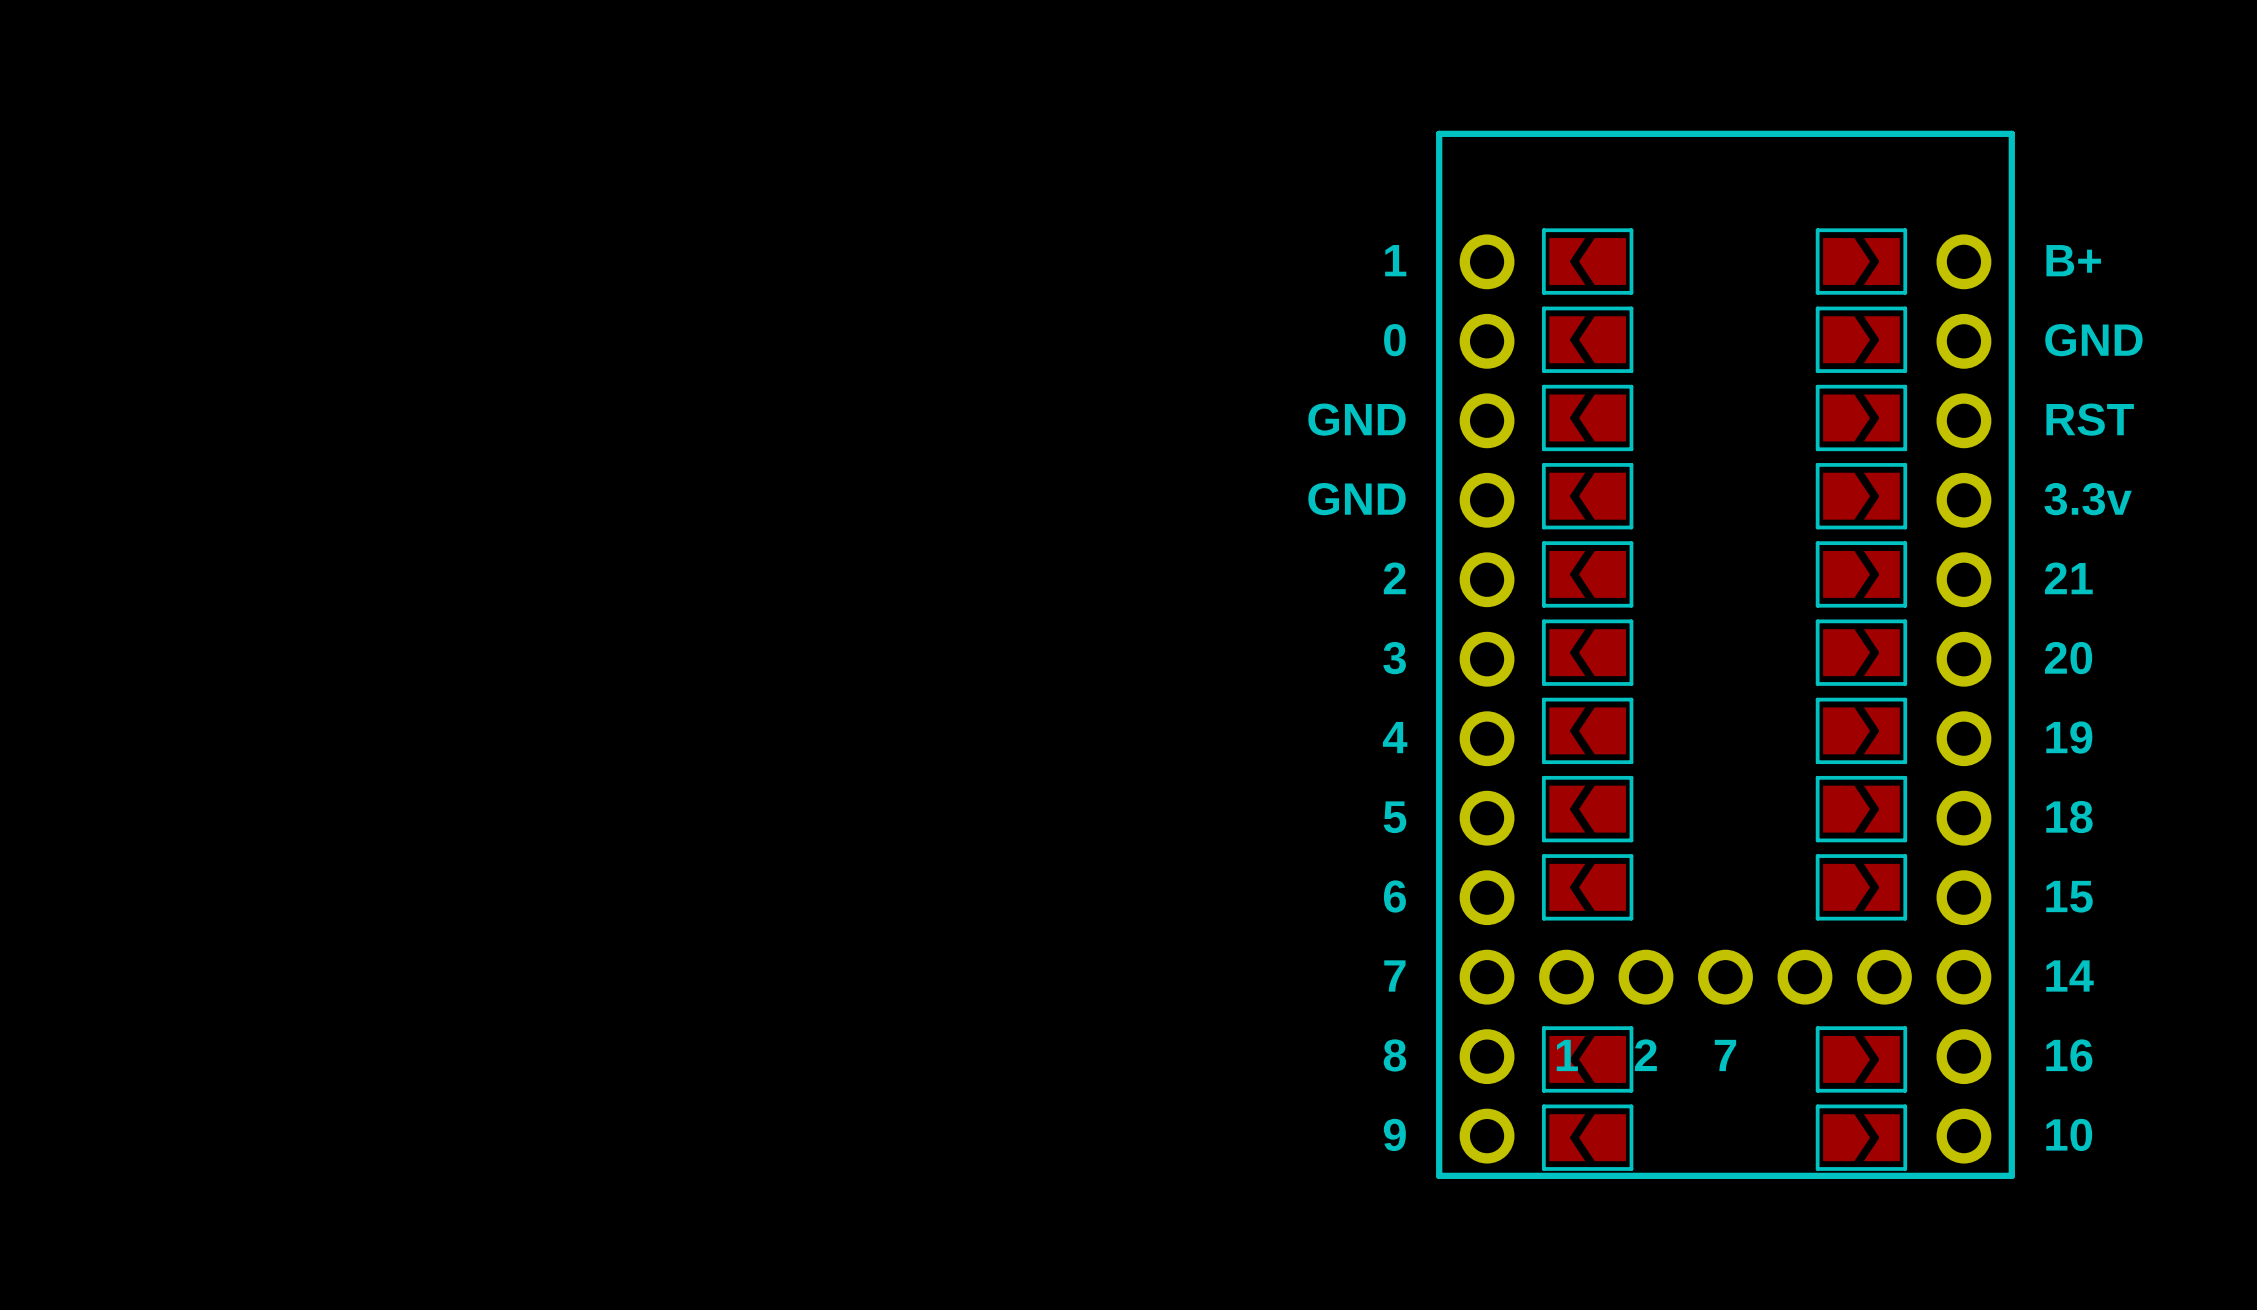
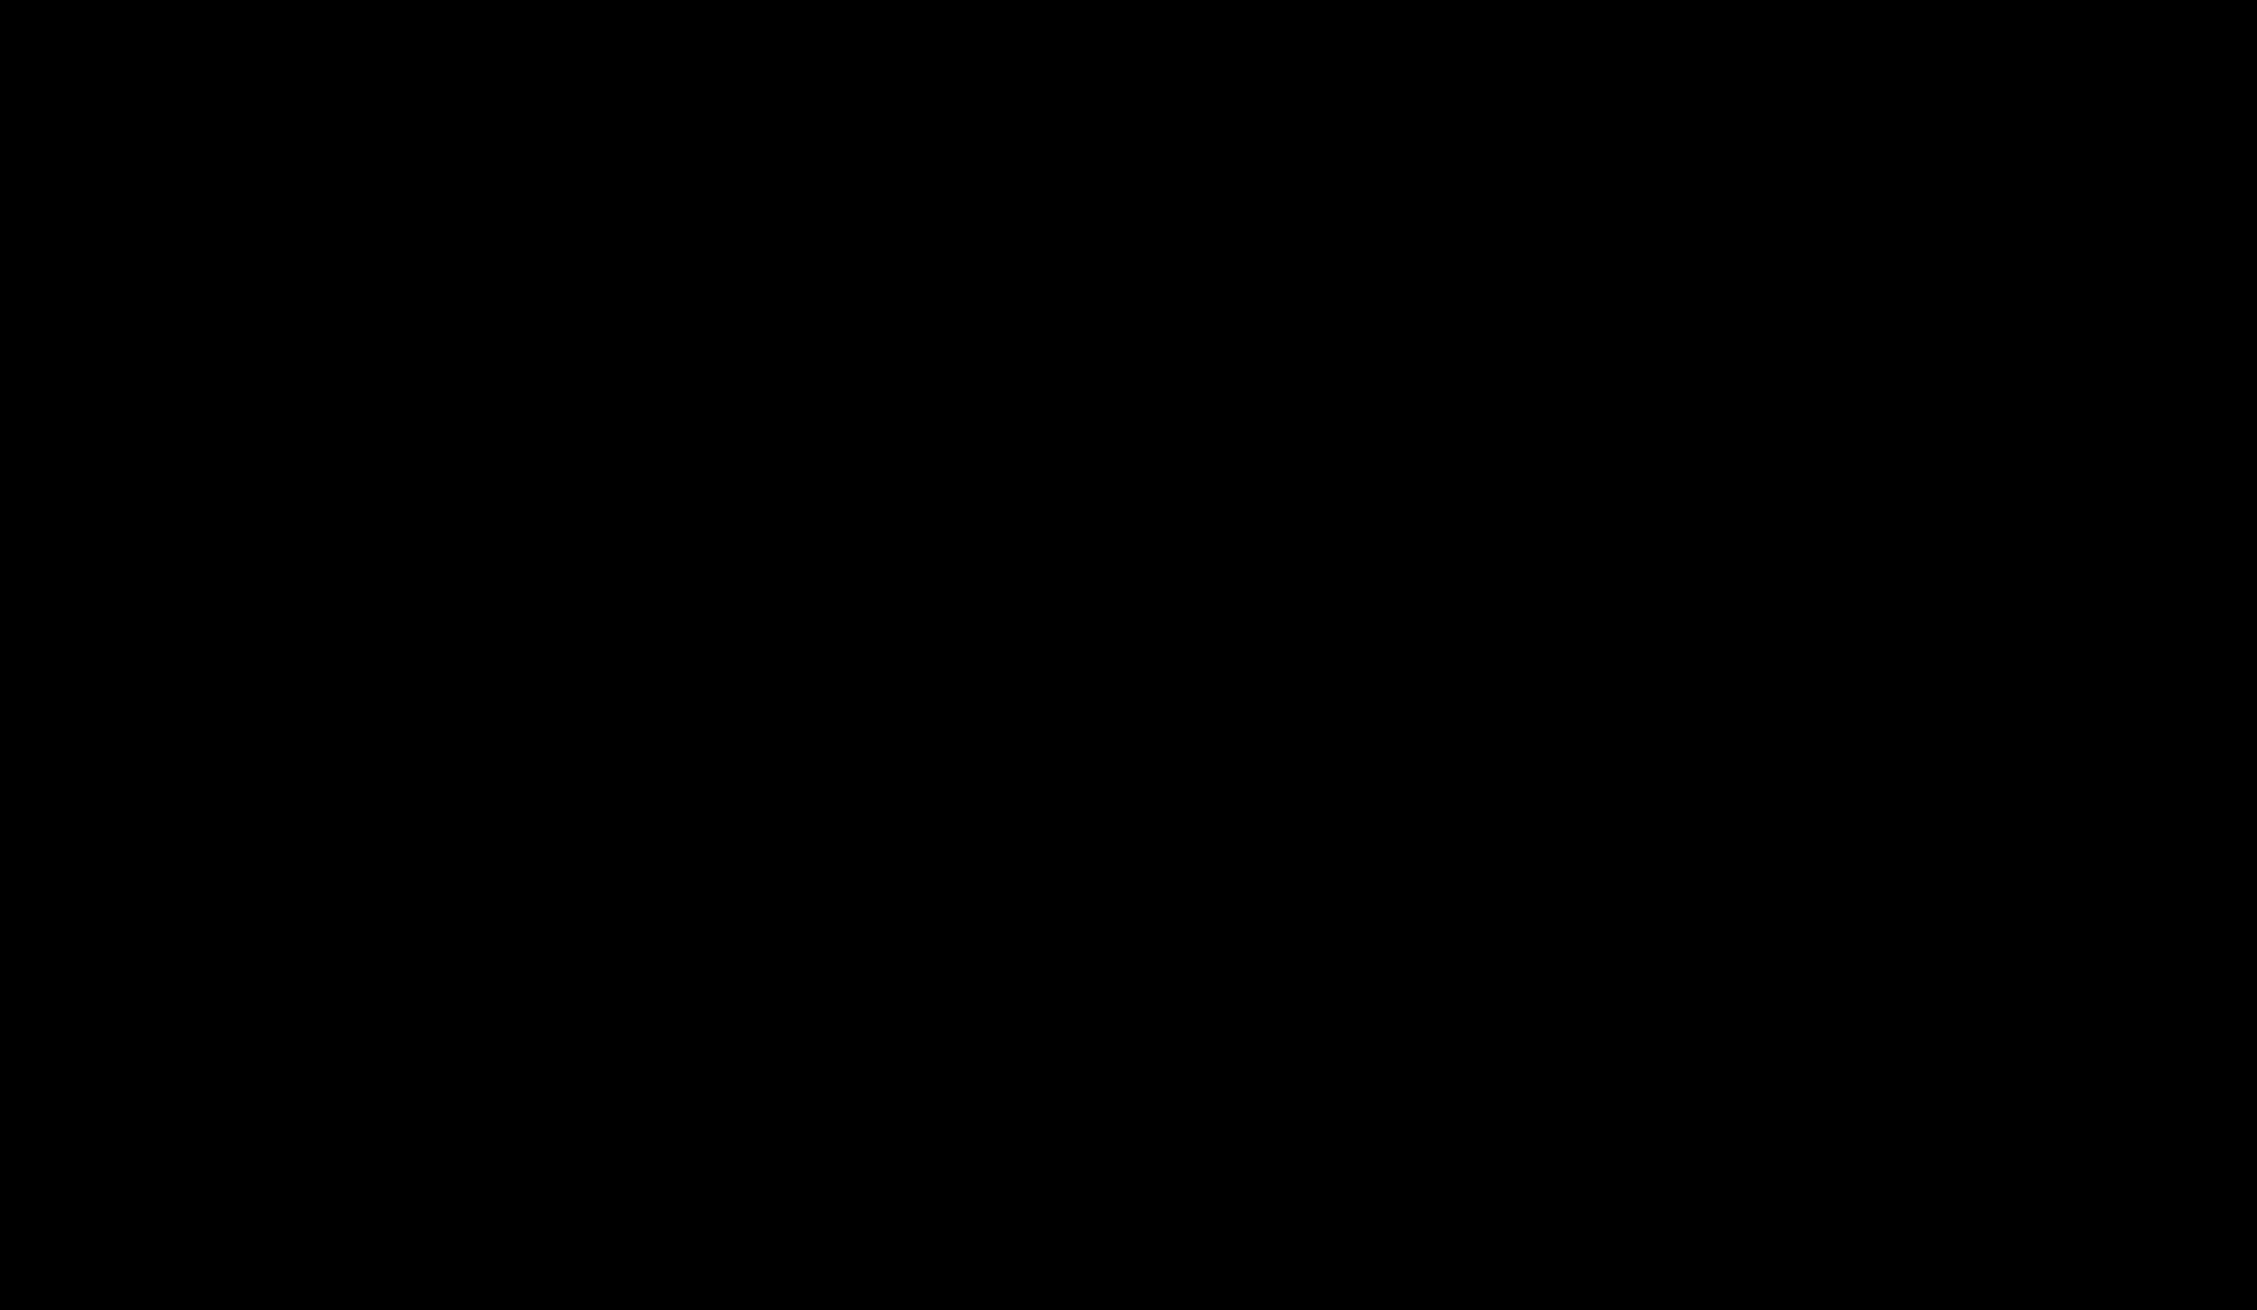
part: (1587, 261) -> none
part: (1861, 261) -> none
part: (1587, 339) -> none
part: (1861, 339) -> none
part: (1587, 417) -> none
part: (1861, 417) -> none
part: (1587, 496) -> none
part: (1861, 496) -> none
part: (1587, 574) -> none
part: (1861, 574) -> none
part: (1587, 652) -> none
part: (1861, 652) -> none
part: (1725, 654) -> none
part: (1587, 730) -> none
part: (1861, 730) -> none
part: (1587, 809) -> none
part: (1861, 809) -> none
part: (1587, 887) -> none
part: (1861, 887) -> none
part: (1587, 1059) -> none
part: (1861, 1059) -> none
part: (1587, 1137) -> none
part: (1861, 1137) -> none

